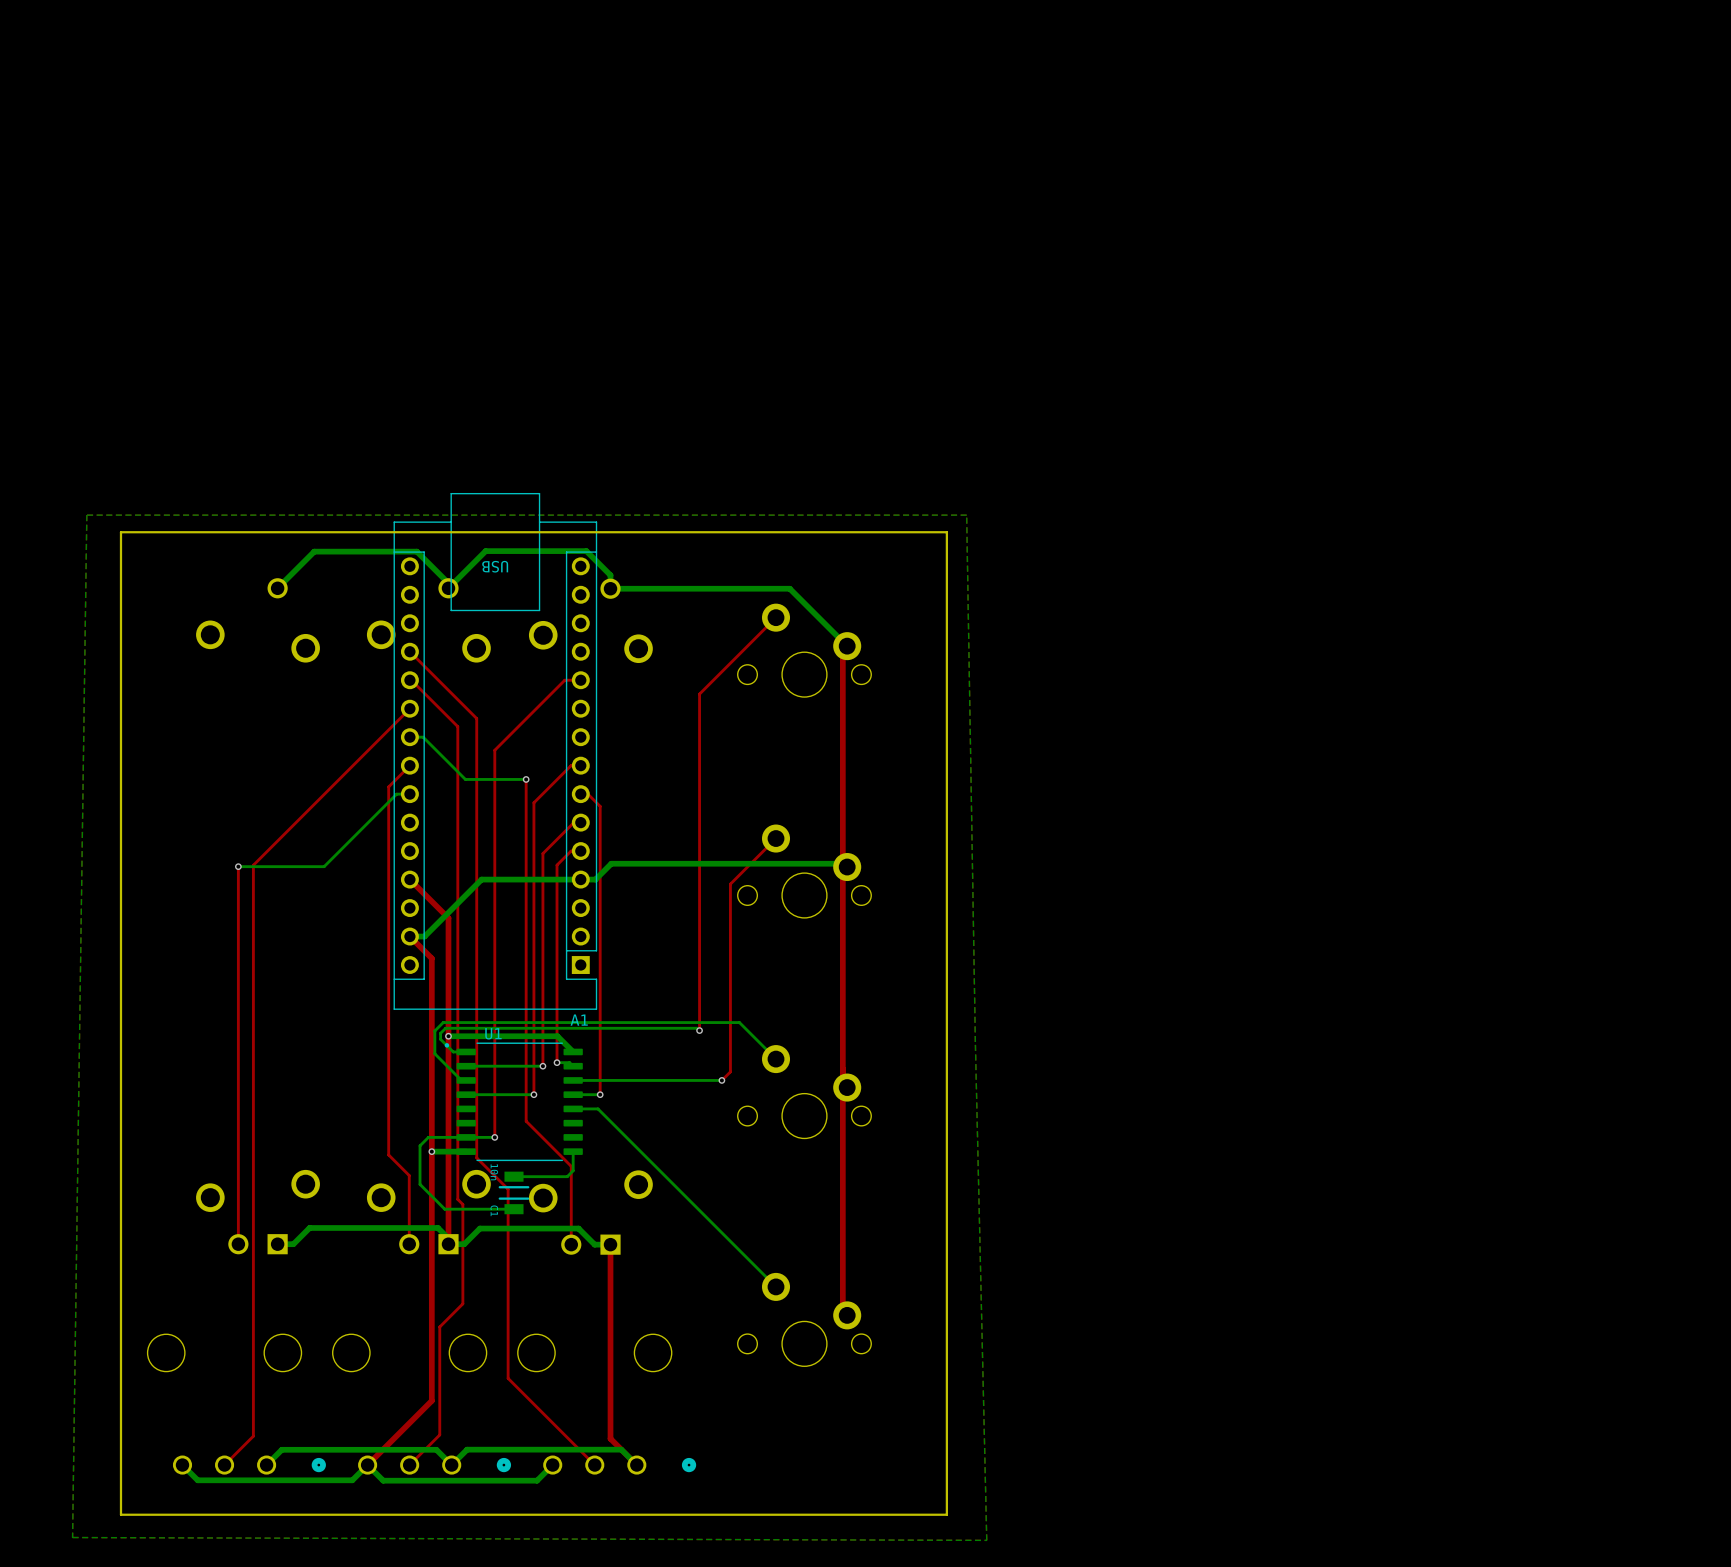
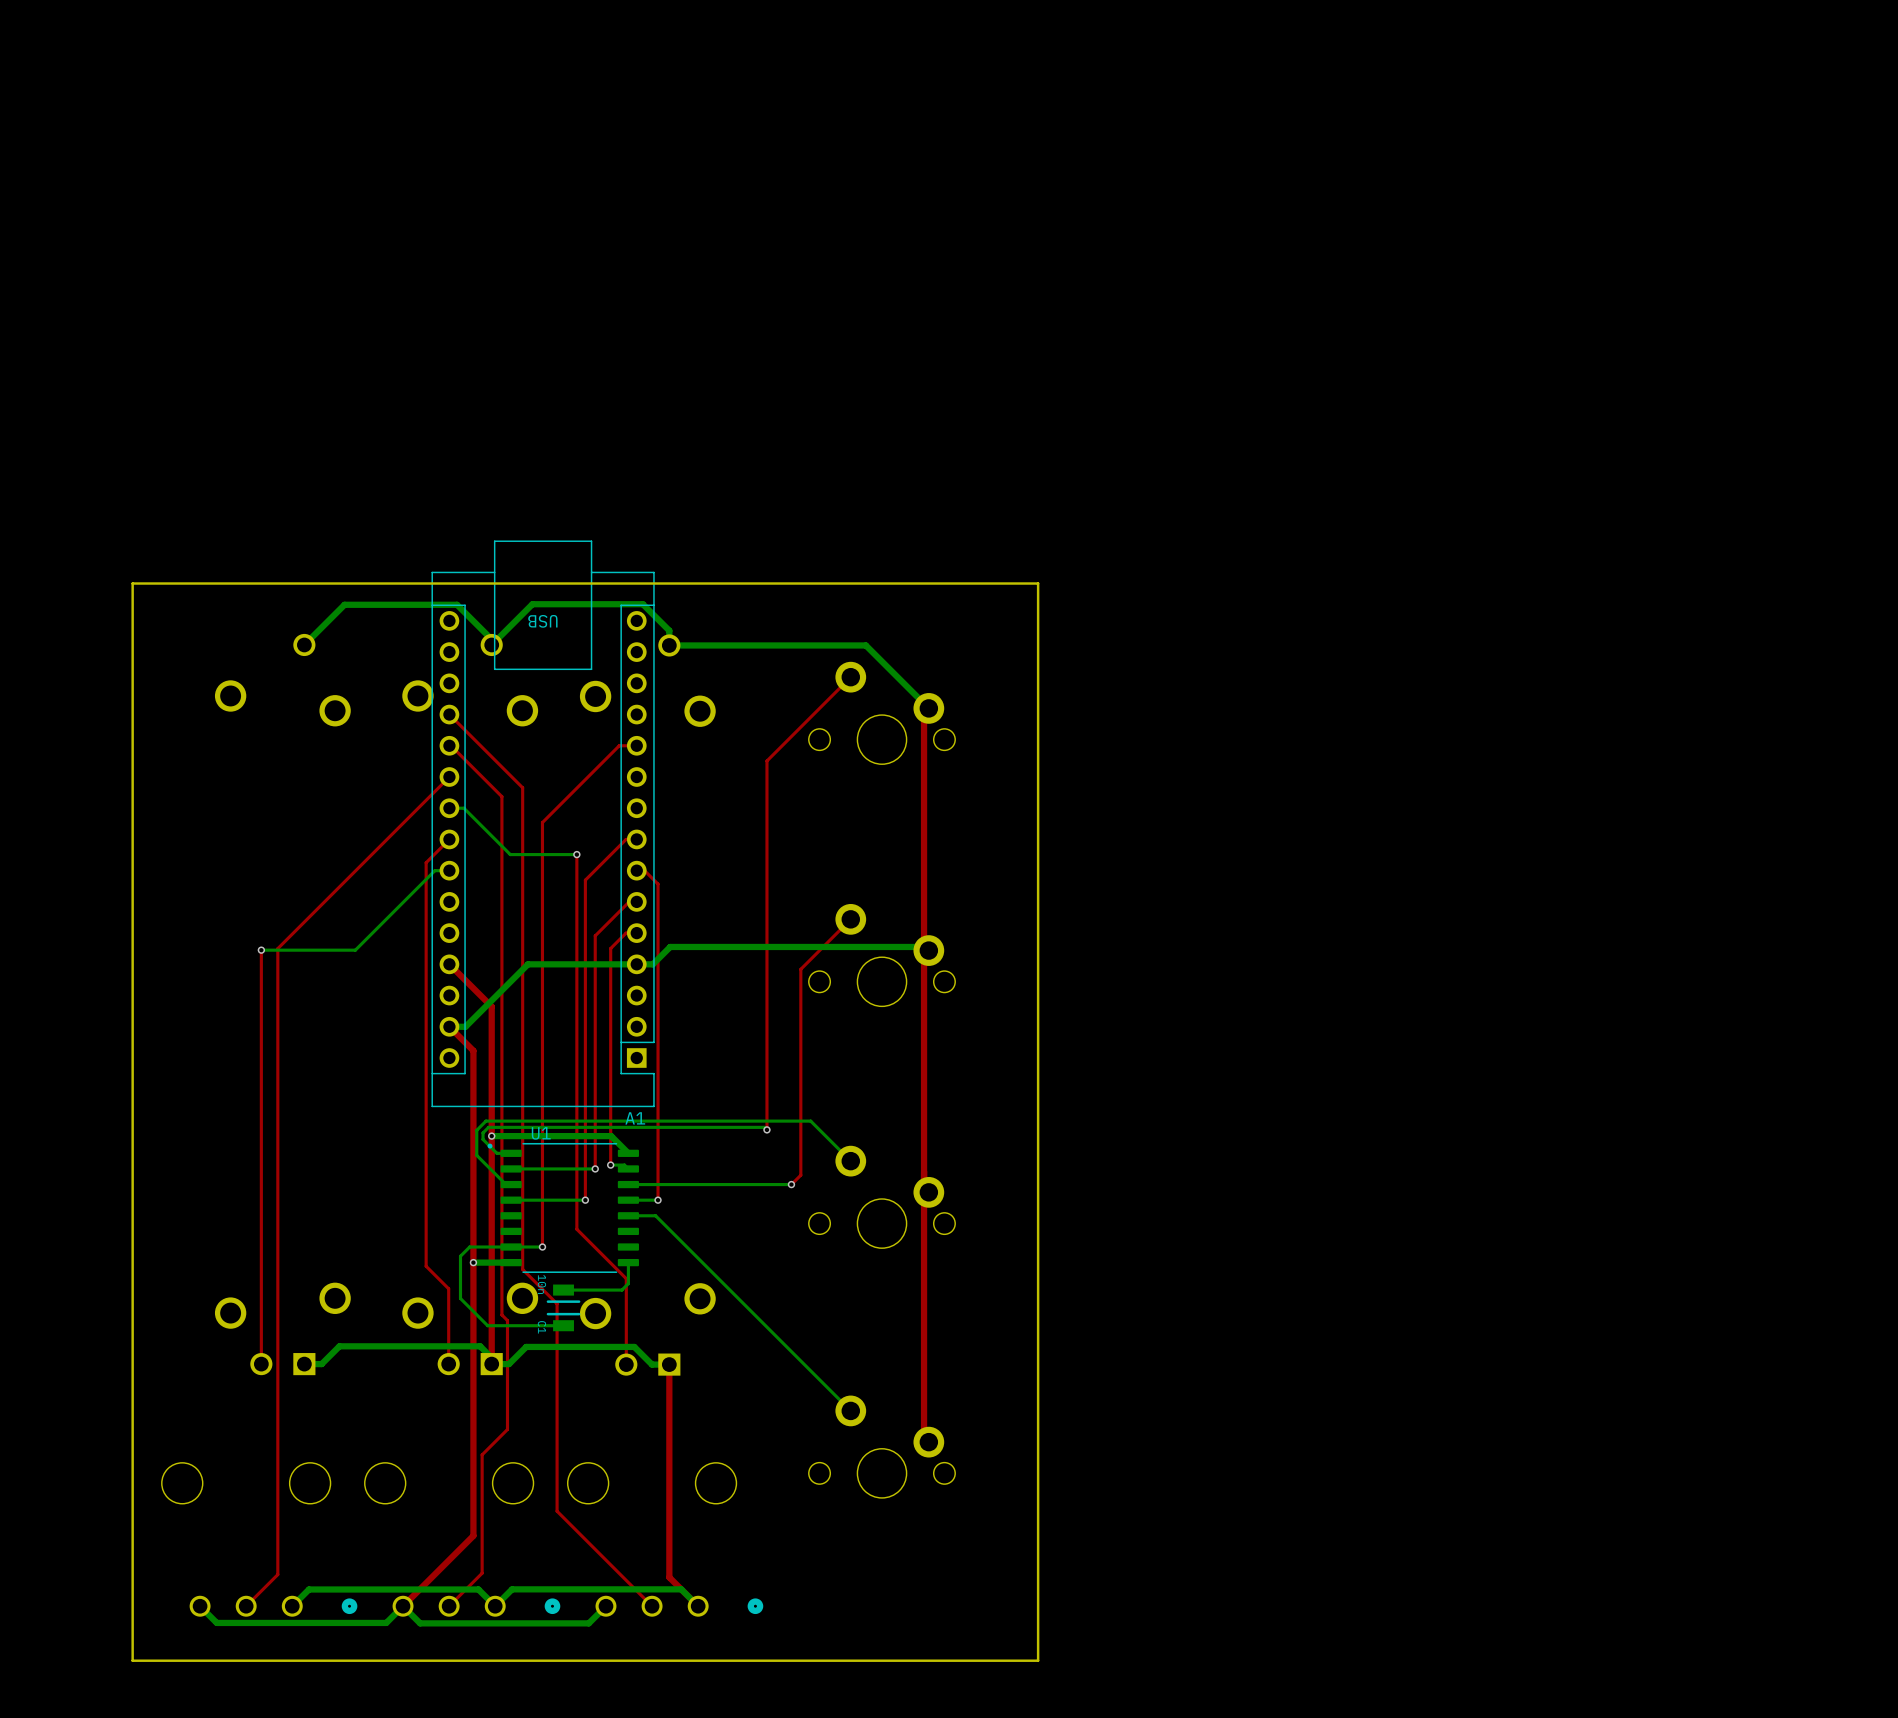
bottom zone outline: (966, 515) (86, 515) (72, 1537) (986, 1540) (975, 1041) (966, 515) -> none

